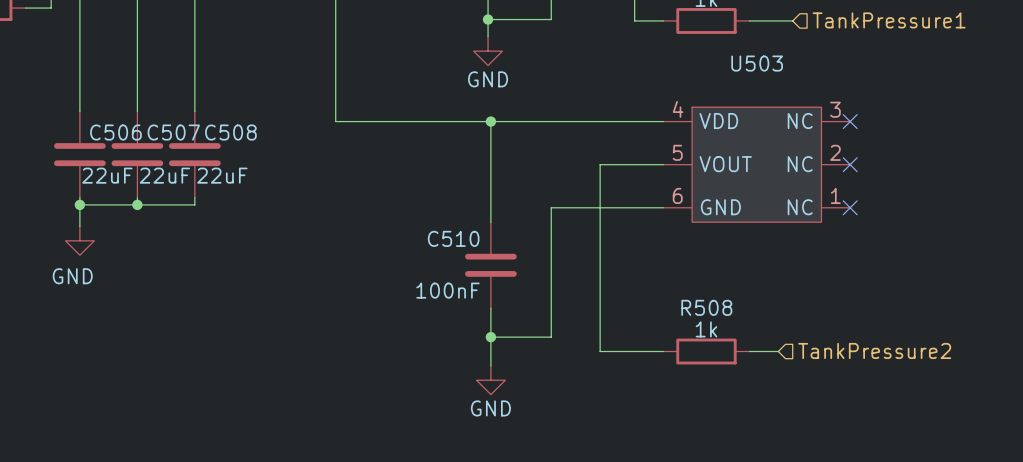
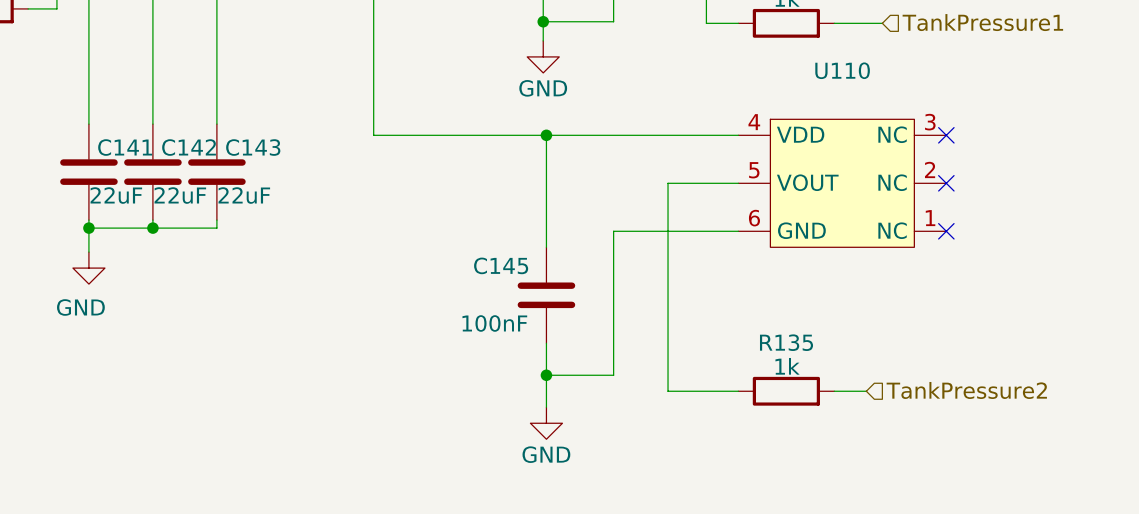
U503 name: U503 (757, 63) -> U110 (842, 70)
C506 name: C506 (115, 132) -> C141 (125, 147)
C507 name: C507 (173, 132) -> C142 (189, 147)
C508 name: C508 (230, 132) -> C143 (253, 147)
C510 name: C510 (453, 238) -> C145 (501, 265)
R508 name: R508 (706, 307) -> R135 (786, 342)

